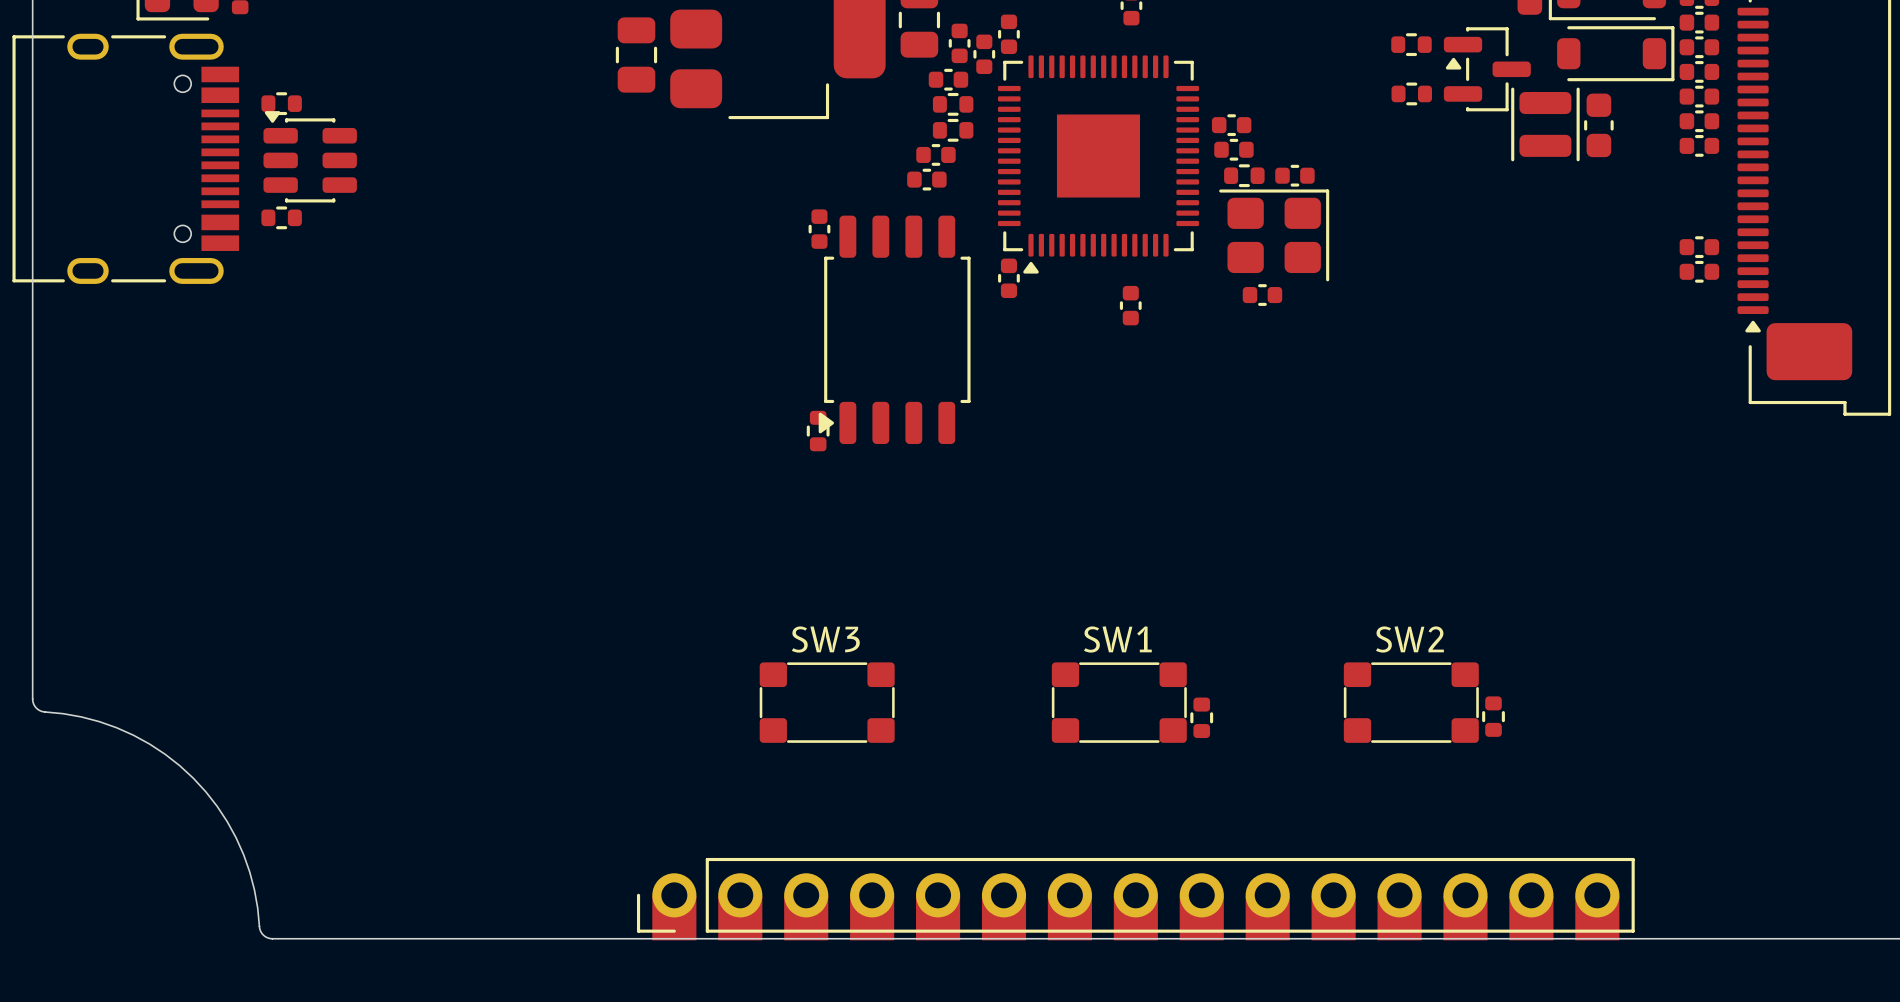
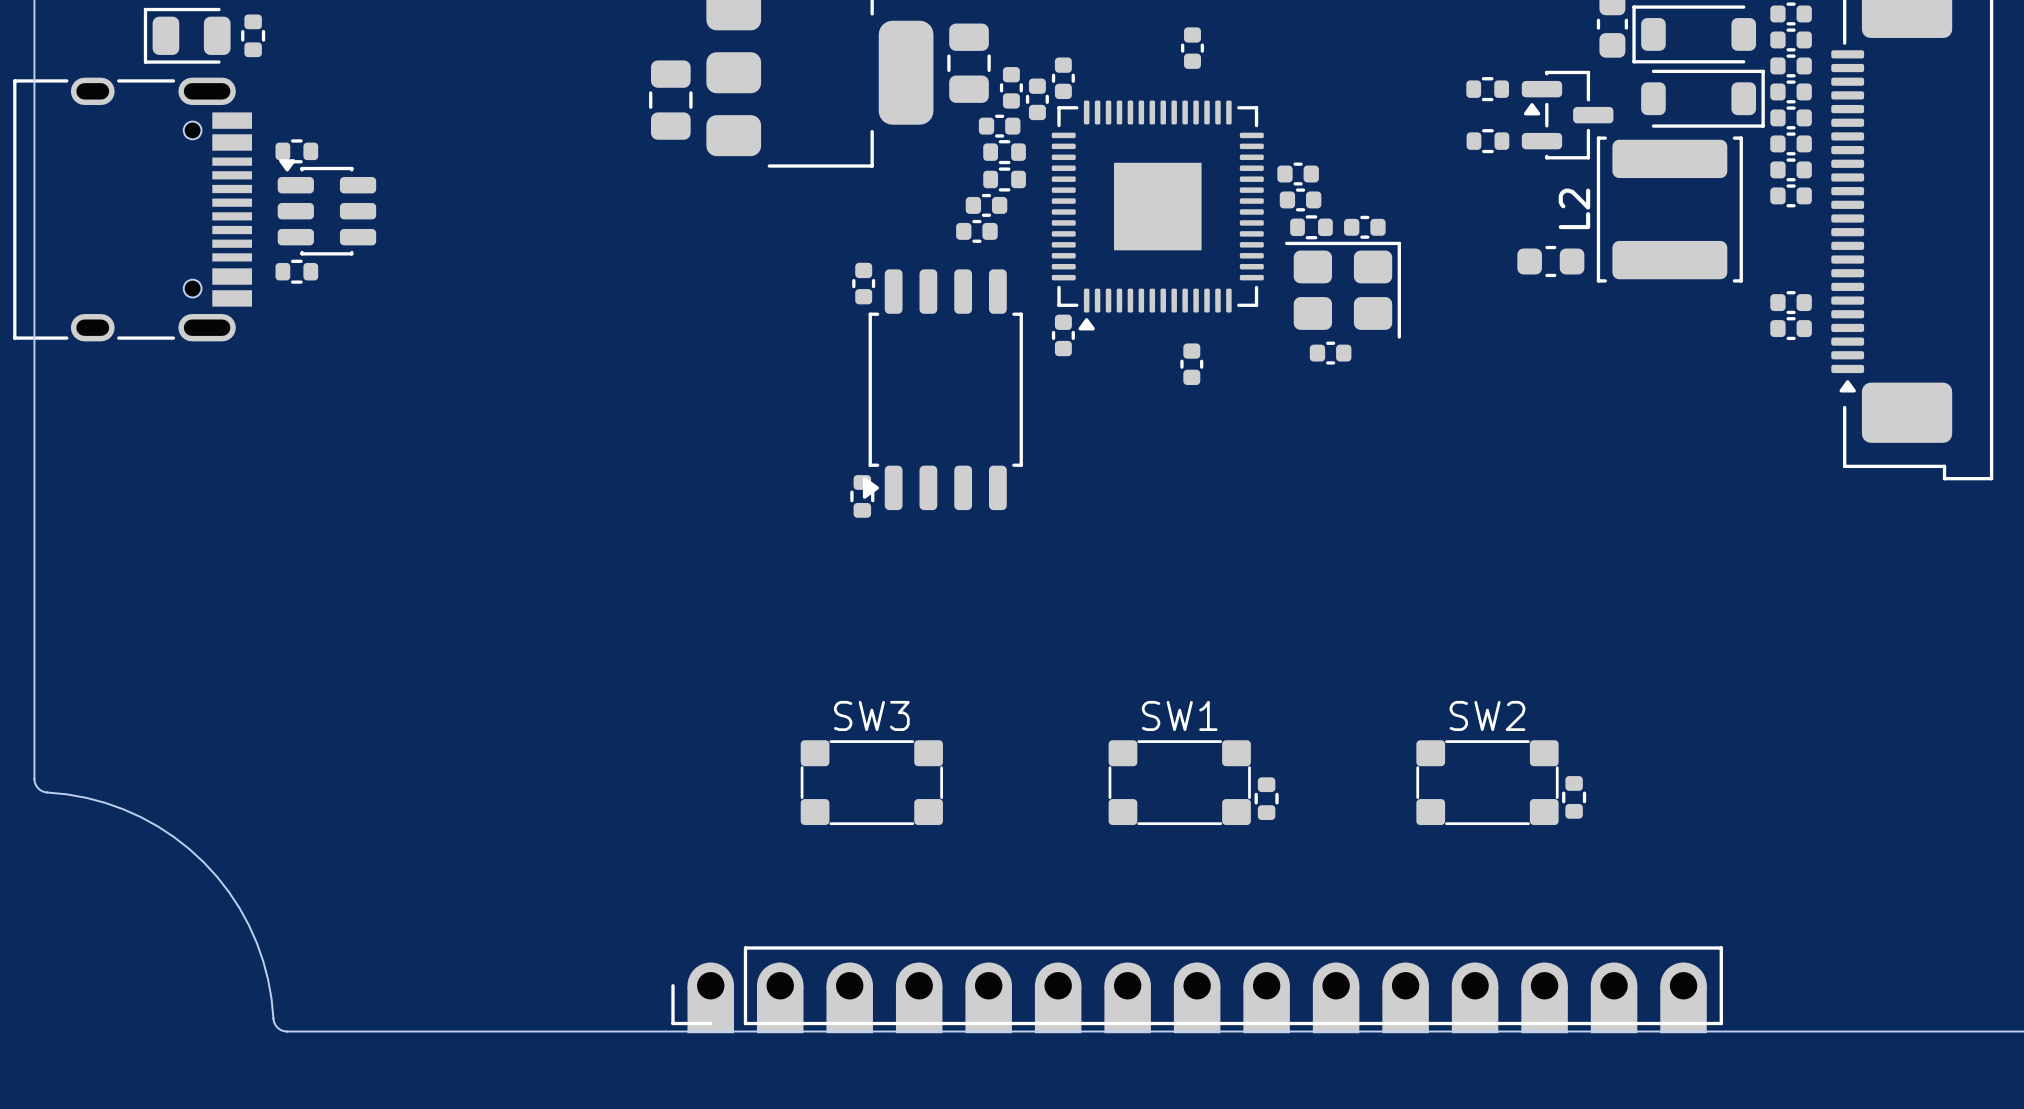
part: (1545, 124) -> none
part rotation: 0° (1598, 125) -> 90° clockwise (1550, 261)
part position: (1598, 125) -> (1550, 261)
L2: none -> (1669, 209)

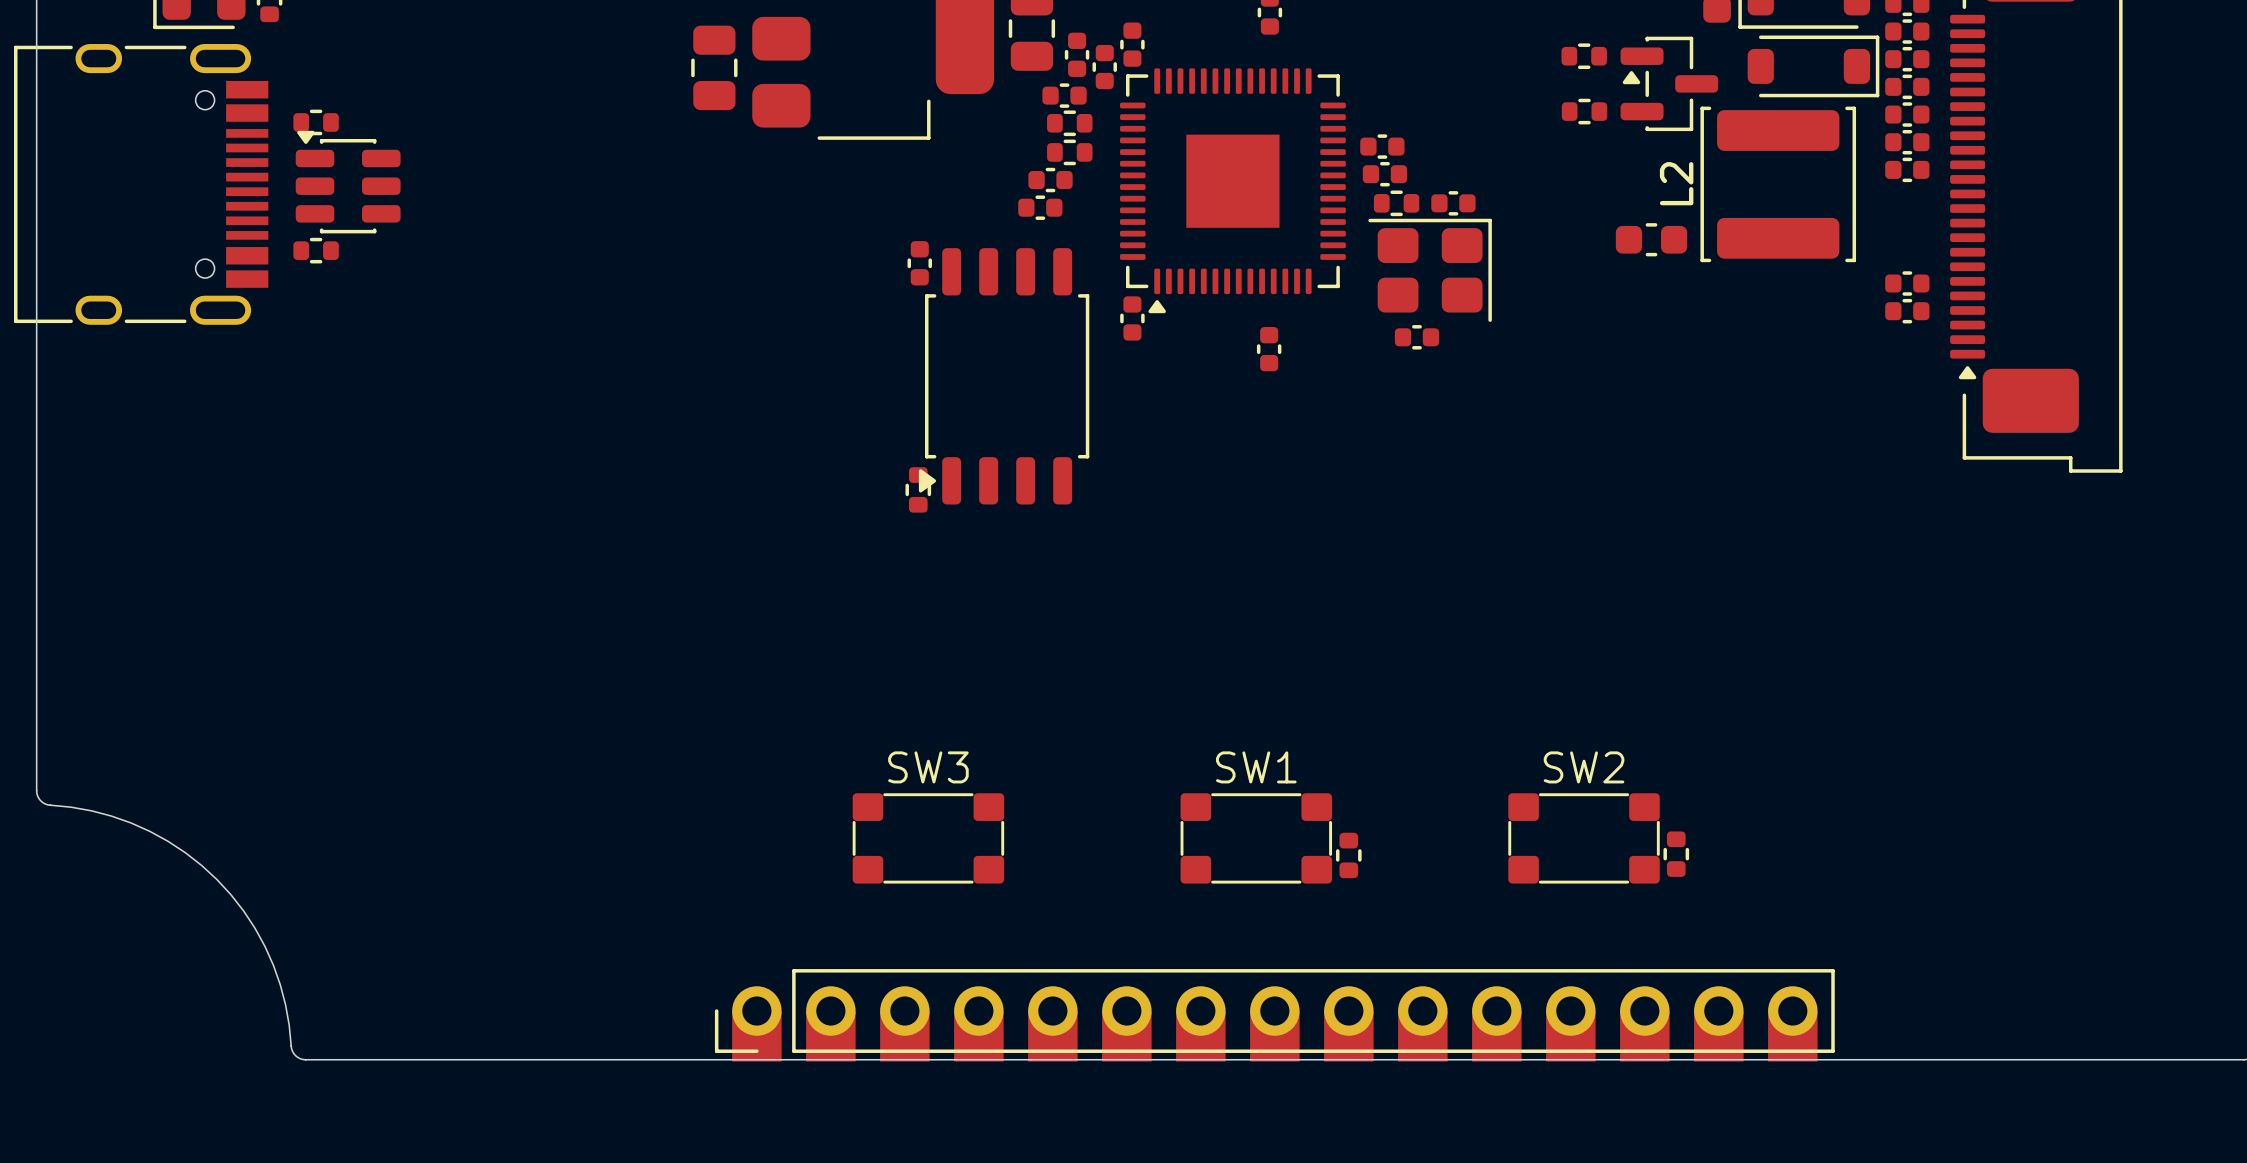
SW3 position: (871, 782) -> (928, 838)
SW1 position: (1179, 782) -> (1256, 838)
SW2 position: (1487, 782) -> (1584, 838)
part position: (1574, 797) -> (1676, 854)
part position: (1266, 798) -> (1348, 855)

